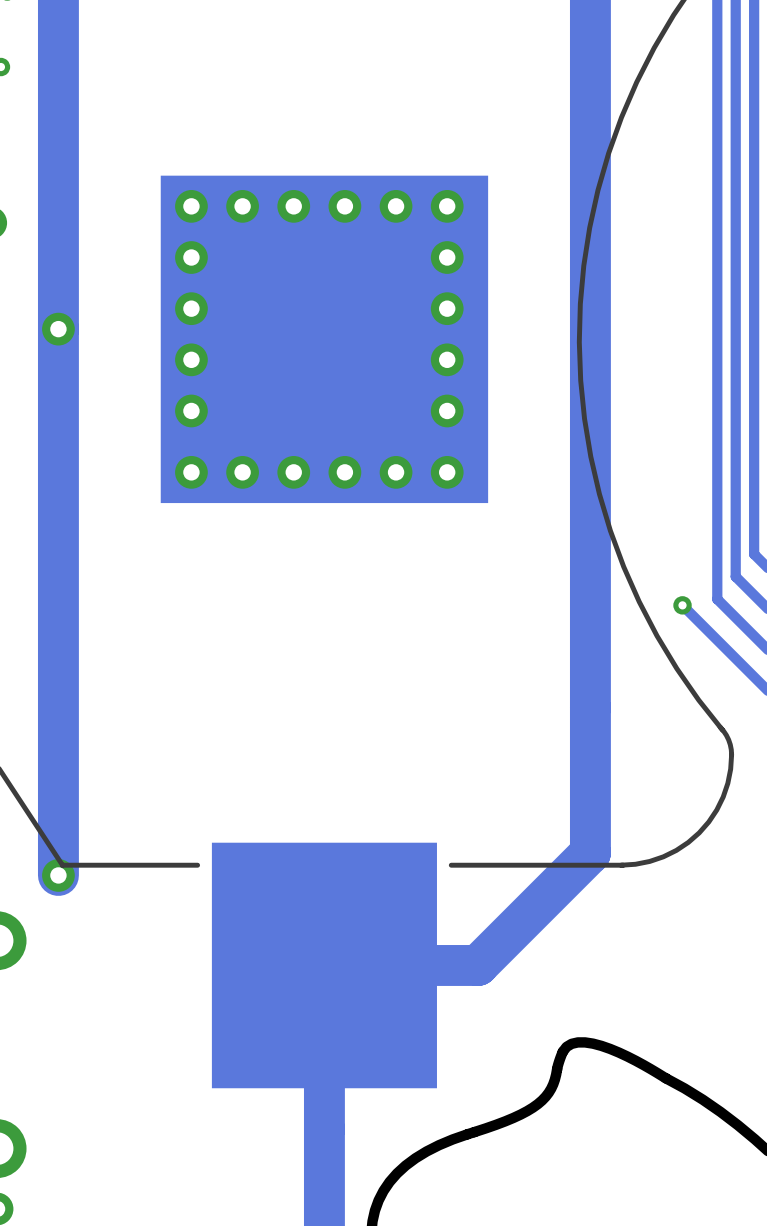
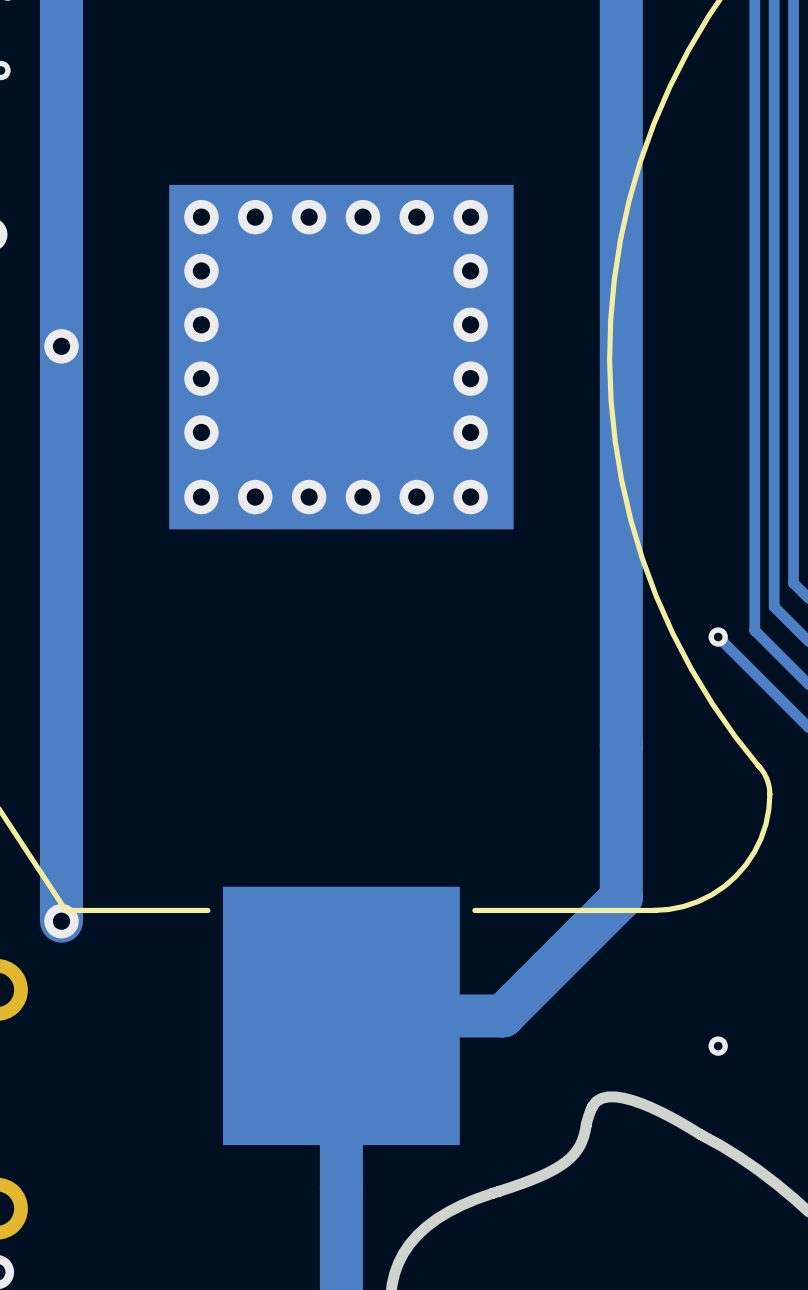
via: none -> (718, 1046)

